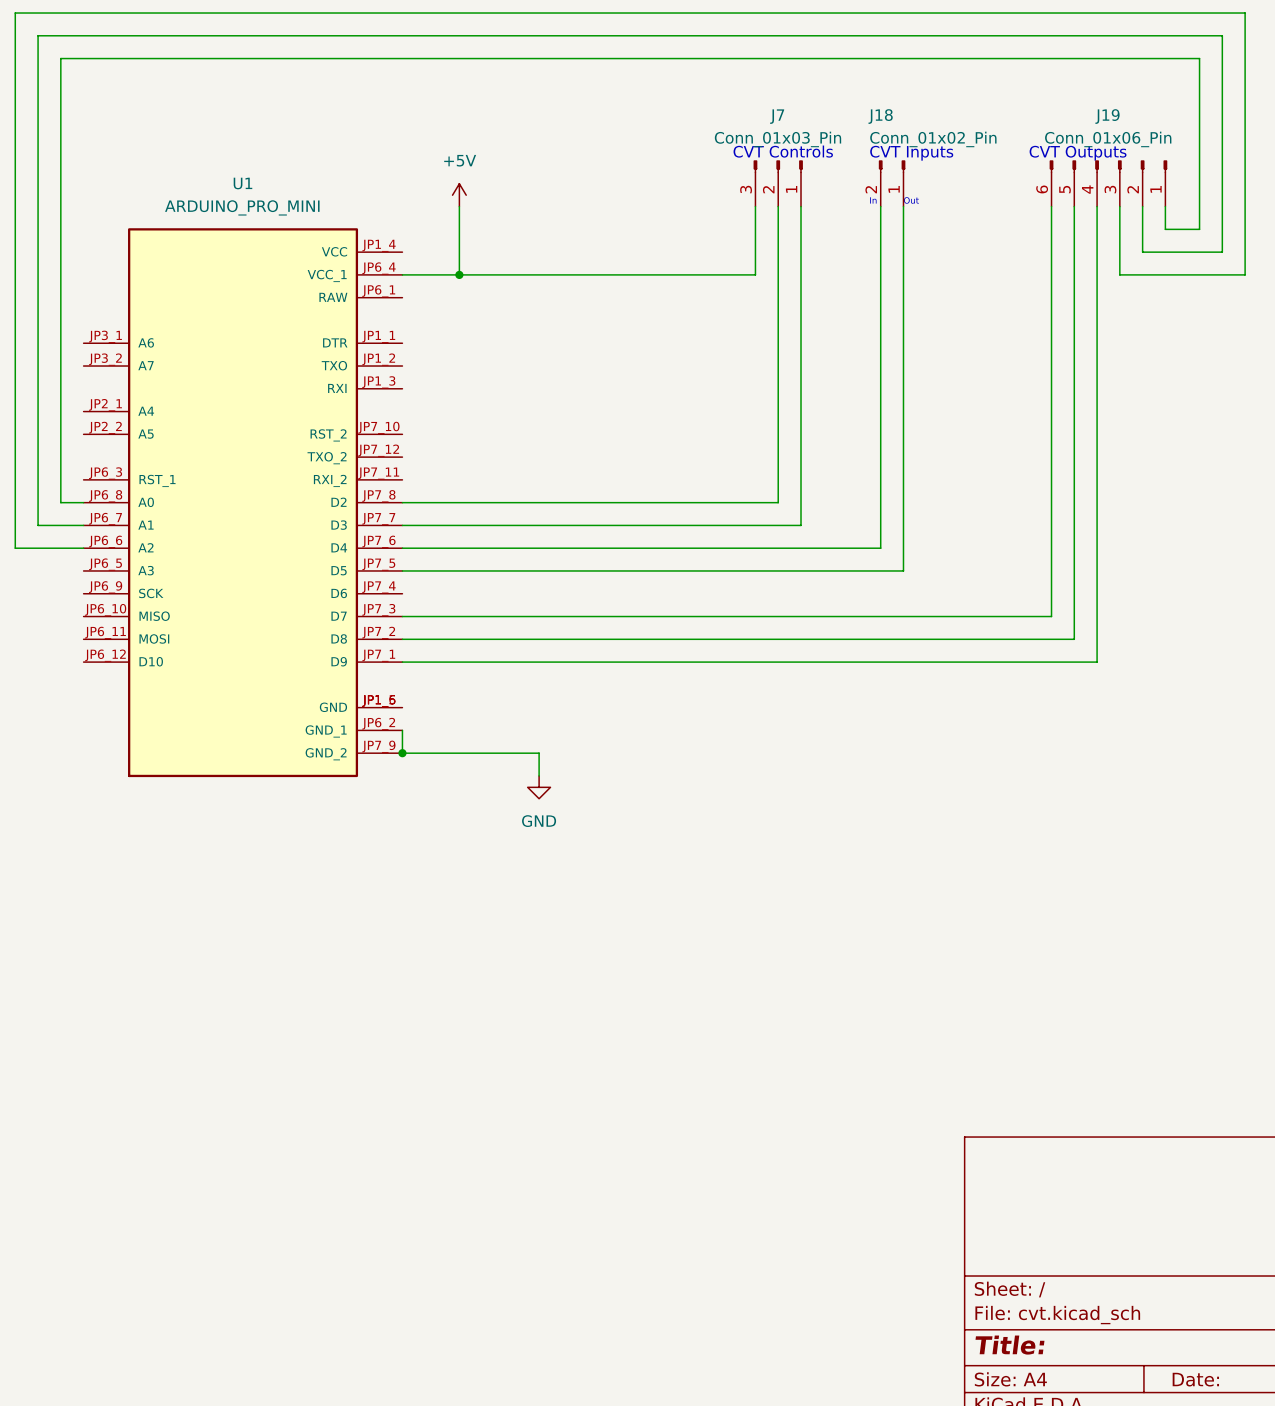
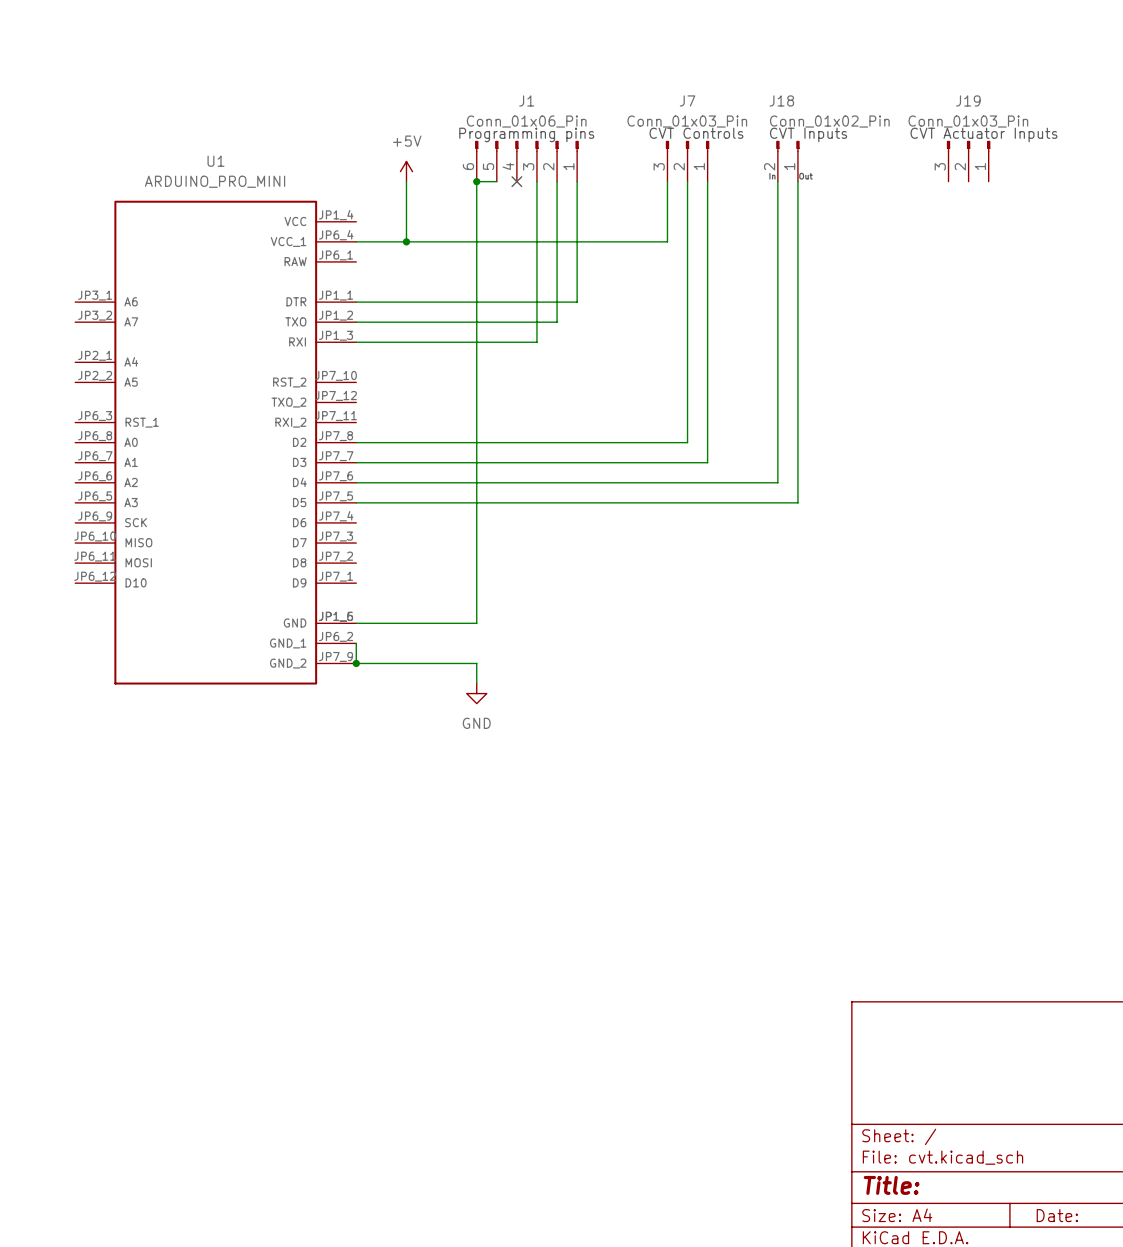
J19 value: Conn_01x06_Pin (1108, 139) -> Conn_01x03_Pin (968, 121)
text: none -> Programming pins (526, 134)
text: CVT Outputs (1078, 153) -> CVT Actuator Inputs (983, 134)
J19 symbol: [1049, 160, 1168, 207] -> [946, 140, 991, 182]
J1: none -> Conn_01x06_Pin (526, 161)
junction: none -> (476, 181)
wire: none -> (496, 181) (476, 181) (476, 623) (356, 623)
no-connect mark: none -> (516, 181)
wire: none -> (536, 181) (536, 342) (356, 342)
wire: none -> (557, 181) (557, 322) (356, 322)
wire: none -> (577, 181) (577, 302) (356, 302)
wire: (1051, 206) (1051, 616) (402, 616) -> none
wire: (1074, 206) (1074, 639) (402, 639) -> none
wire: (1097, 206) (1097, 662) (402, 662) -> none
wire: (1119, 206) (1119, 274) (1245, 274) (1245, 13) (15, 13) (15, 548) (83, 548) -> none
wire: (1142, 206) (1142, 252) (1222, 252) (1222, 35) (38, 35) (38, 525) (83, 525) -> none
wire: (1165, 206) (1165, 229) (1199, 229) (1199, 58) (60, 58) (60, 502) (83, 502) -> none

